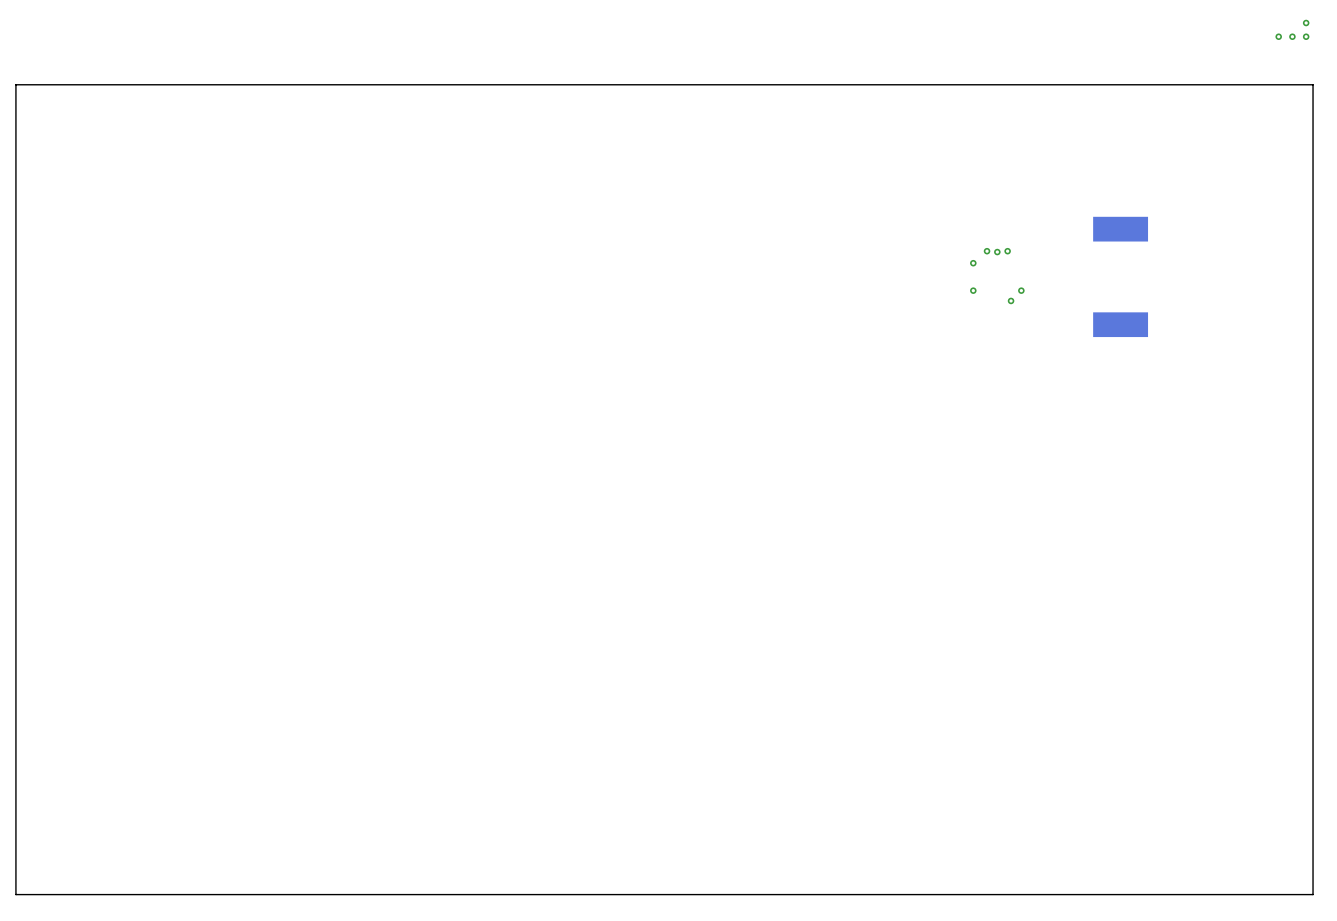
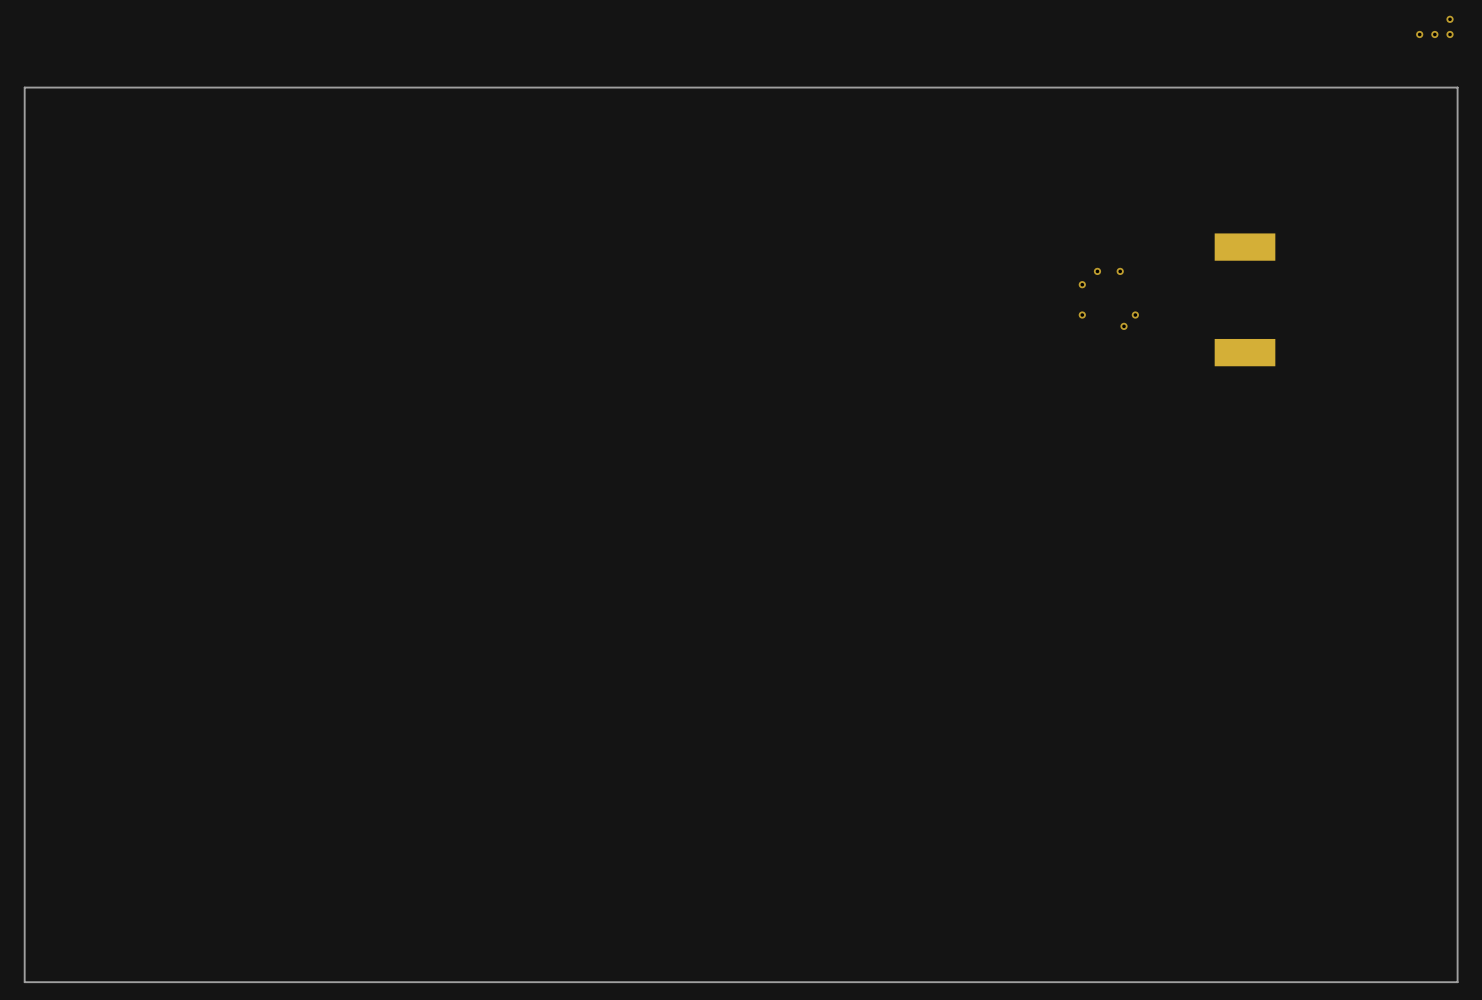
via: (997, 252) -> none

